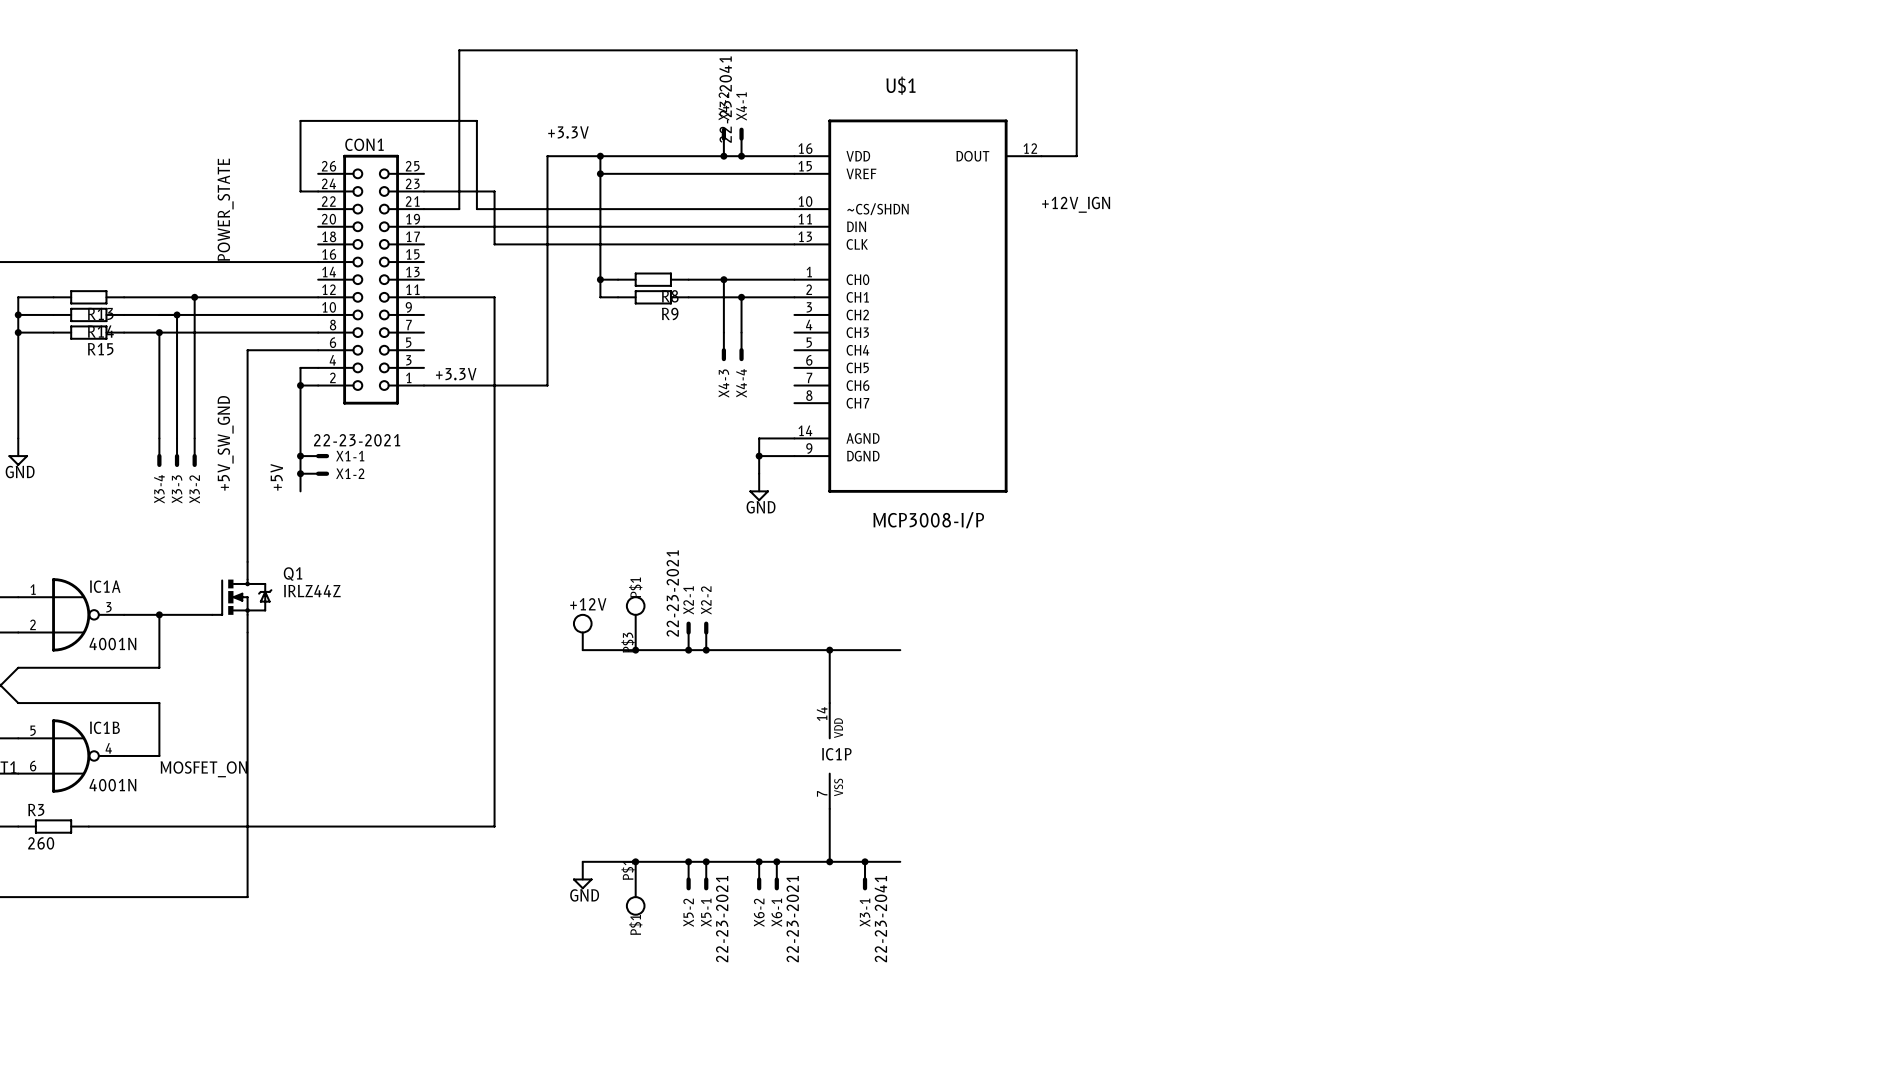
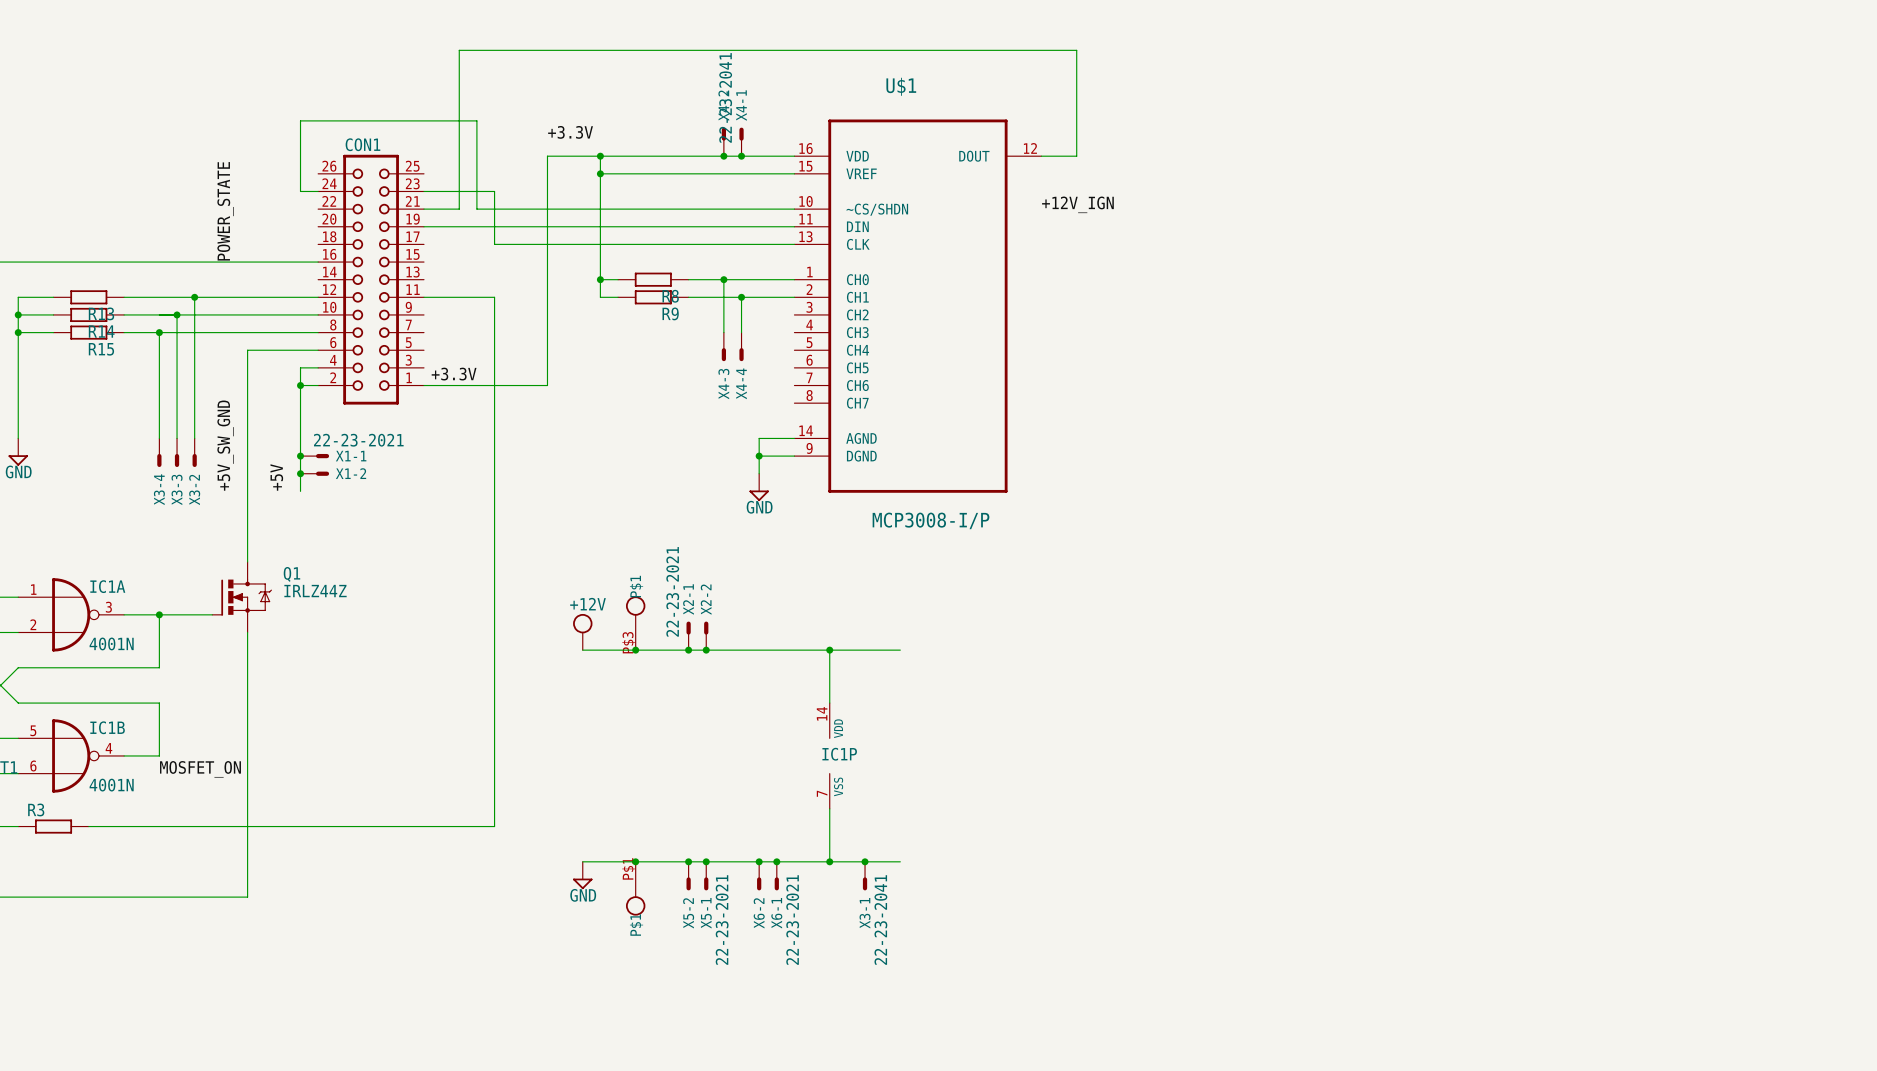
R3 value: 260 (41, 843) -> none

